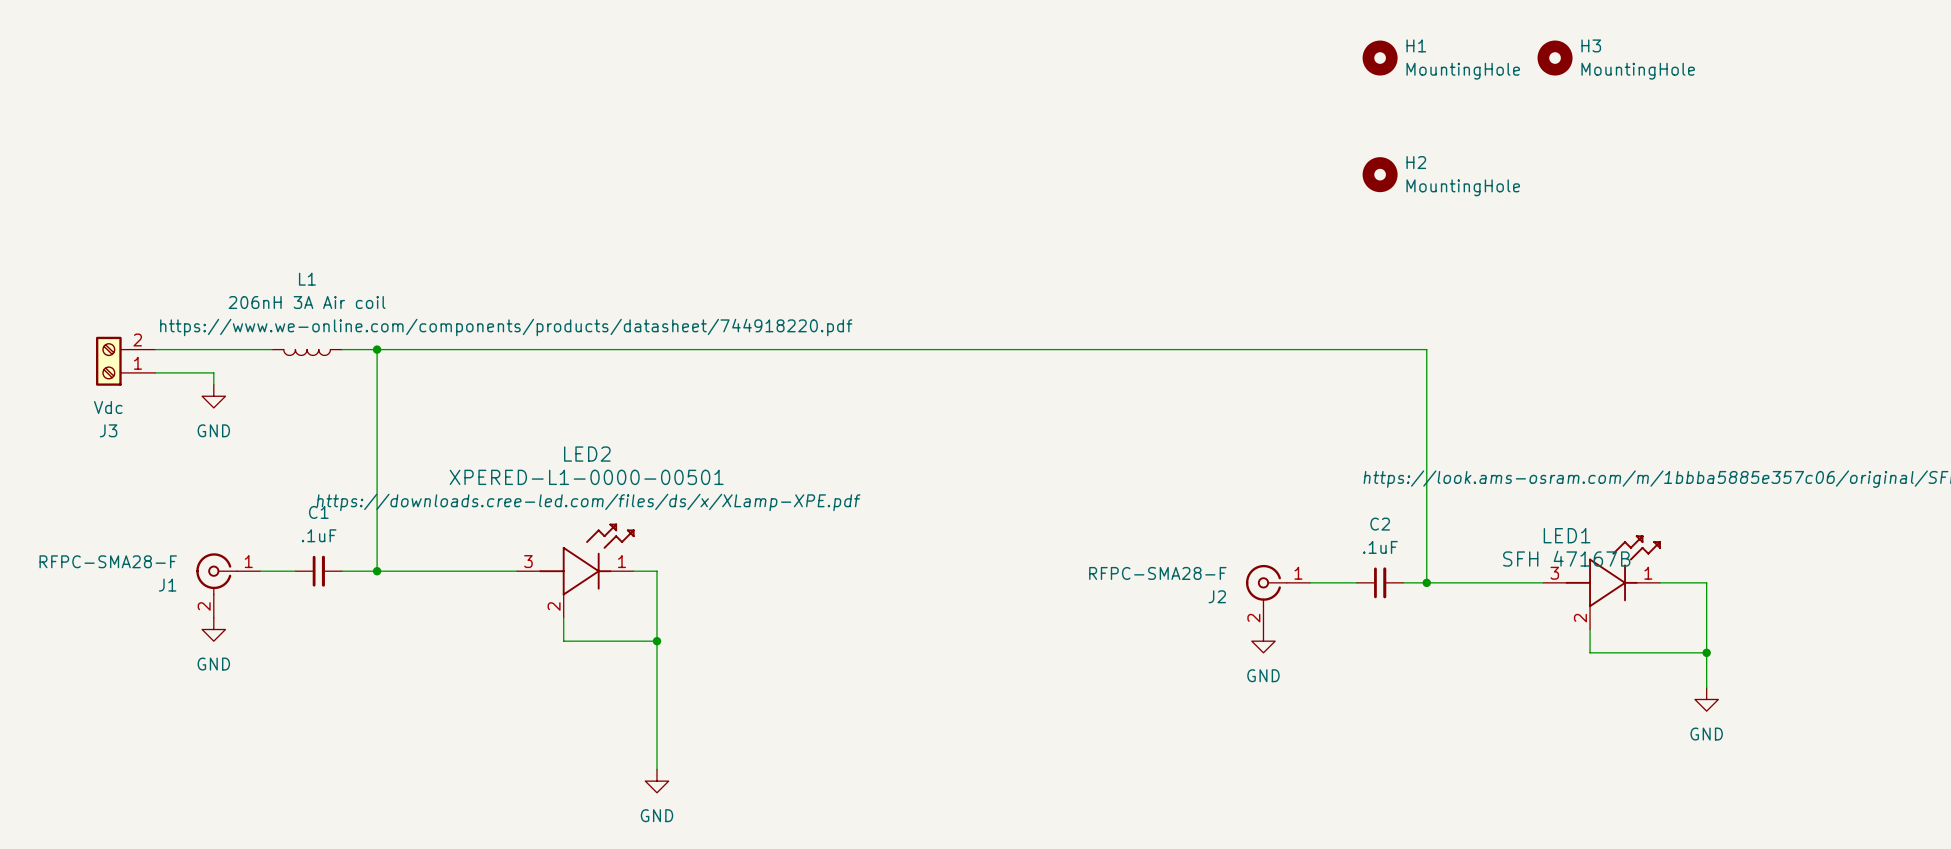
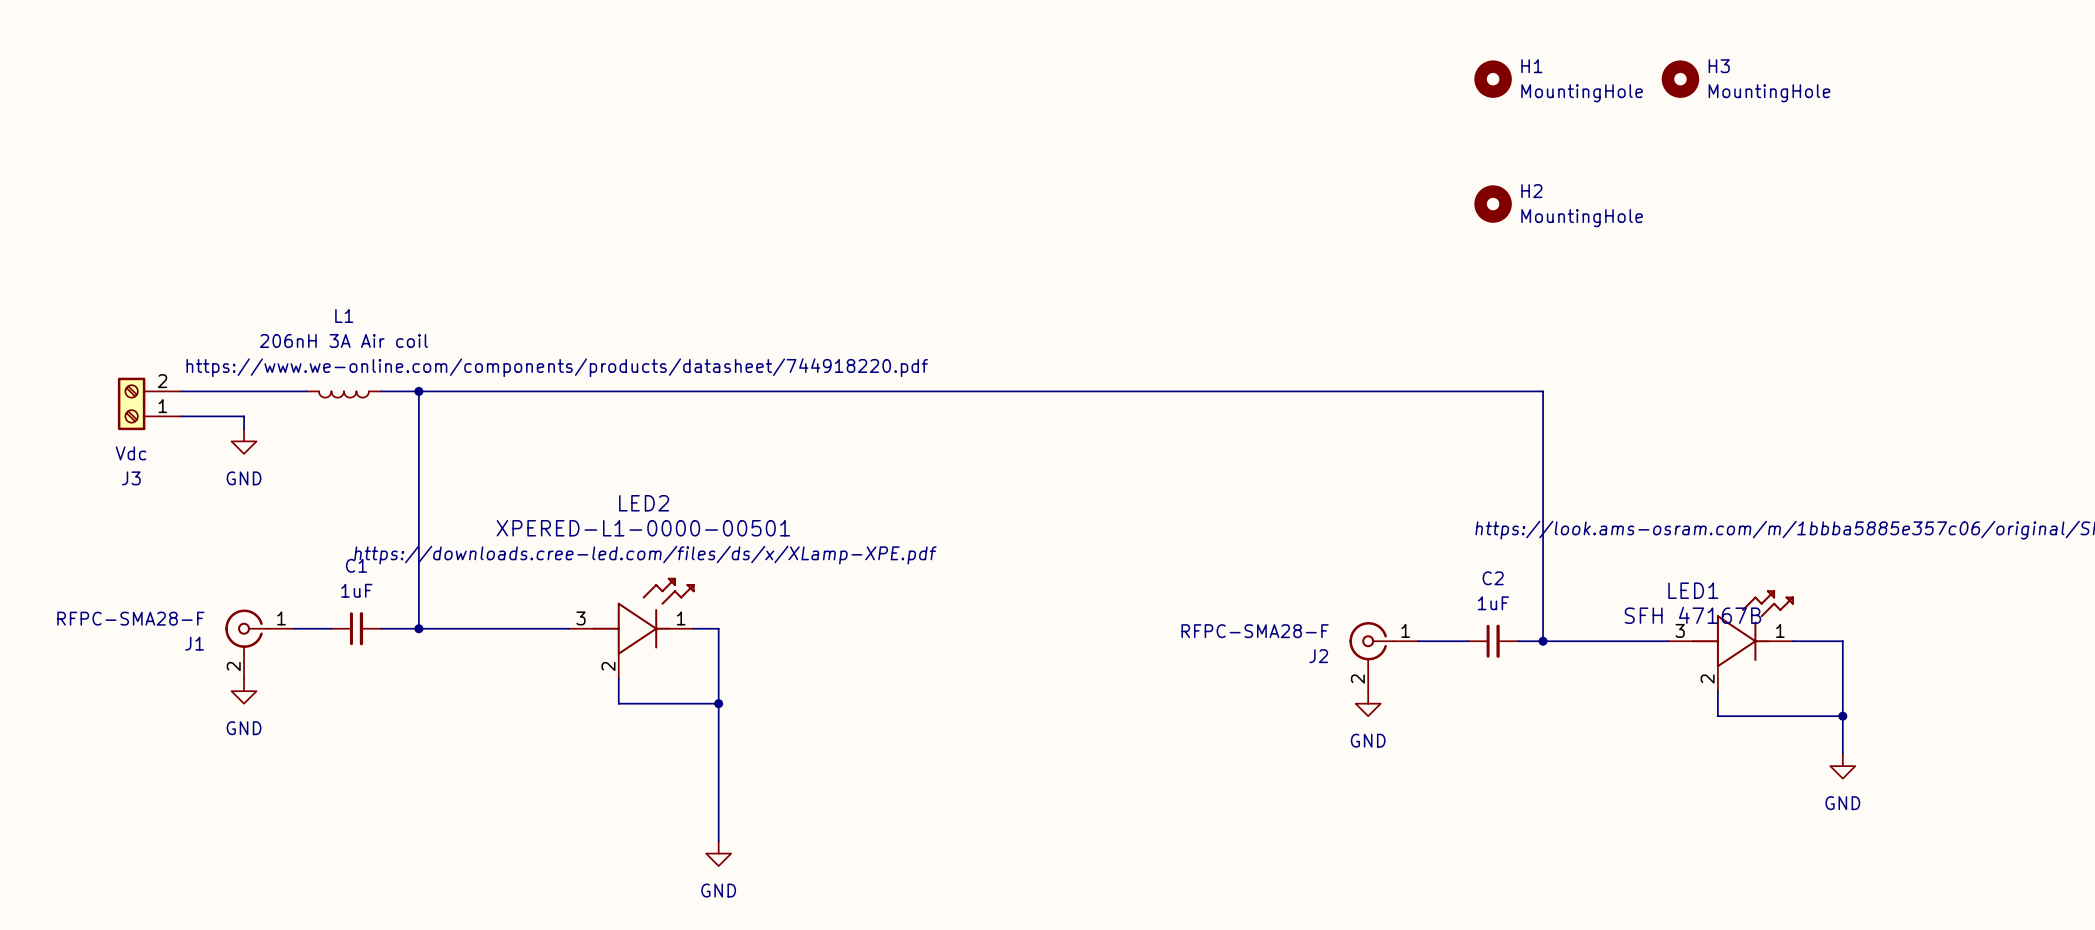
C1 value: .1uF (319, 535) -> 1uF (356, 590)
C2 value: .1uF (1380, 547) -> 1uF (1493, 603)

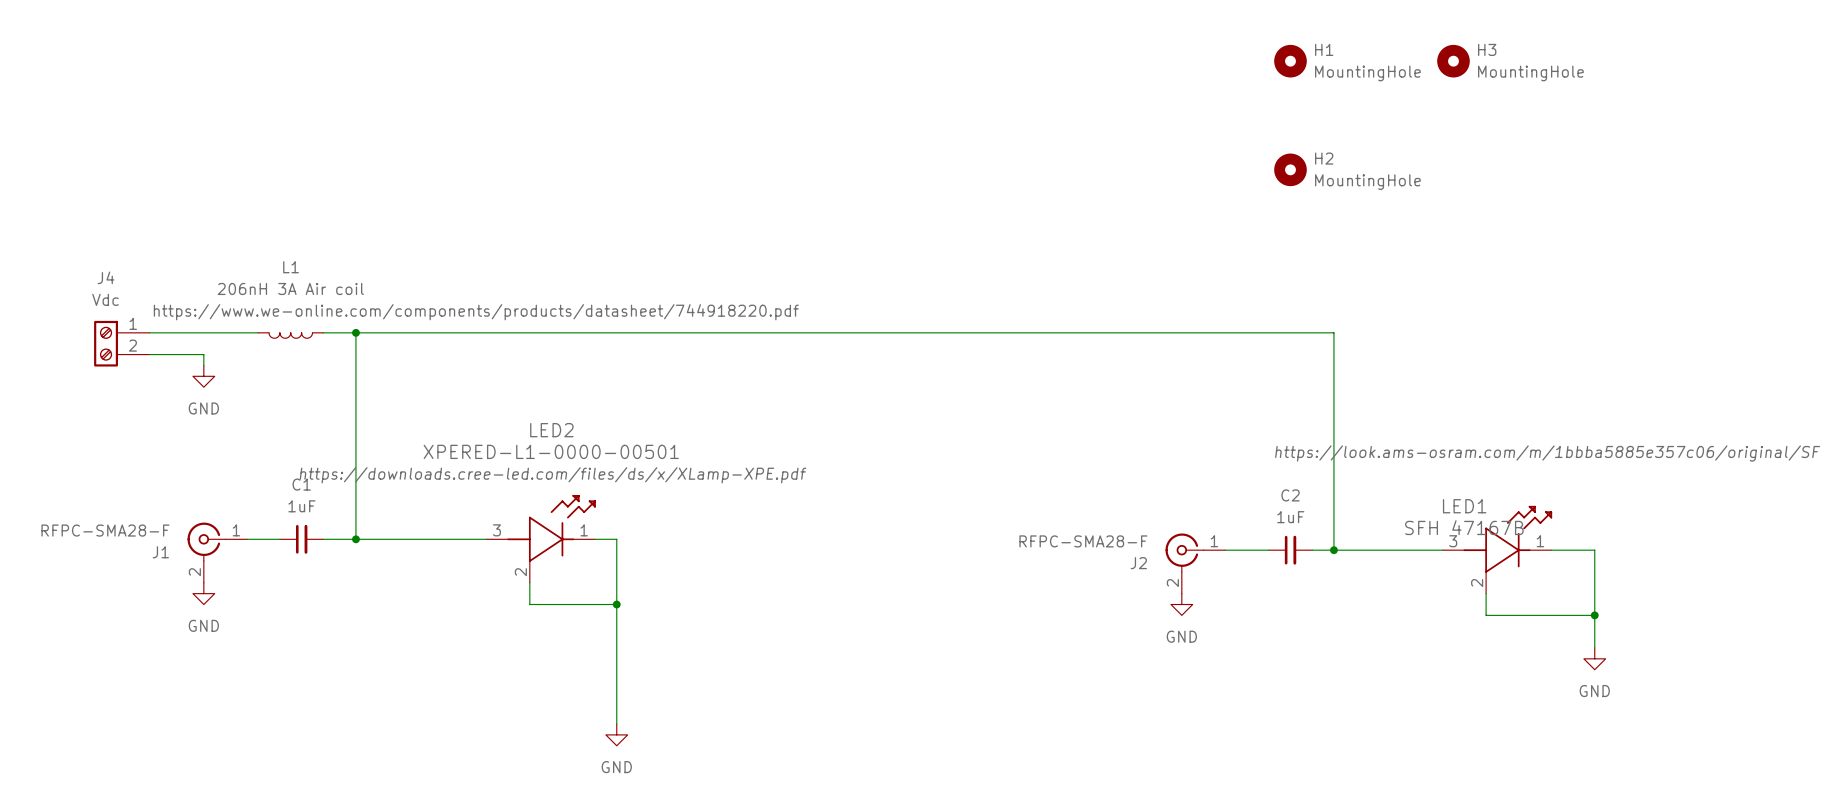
J3: Vdc (149, 403) -> none
J4: none -> Vdc (121, 343)

